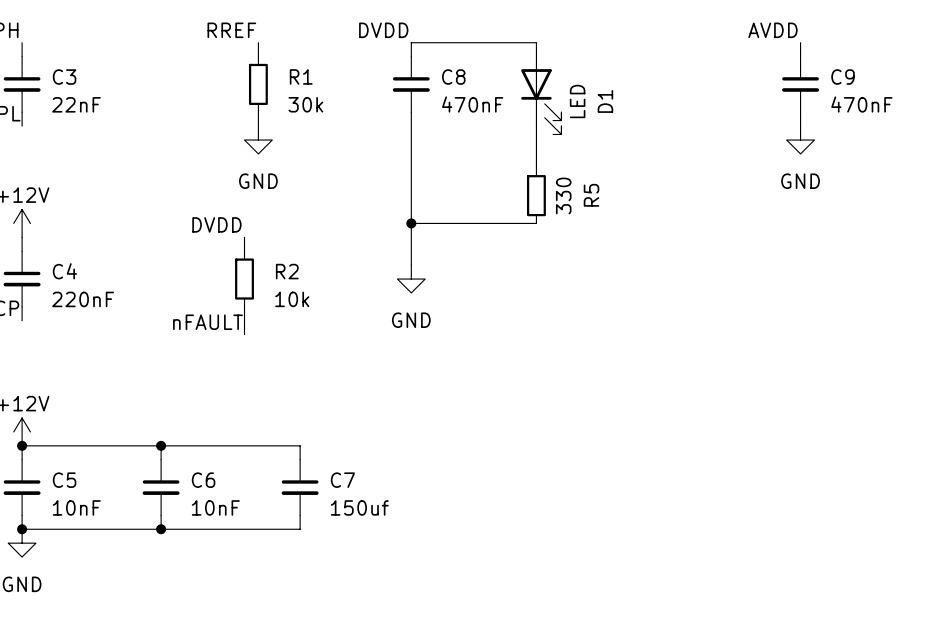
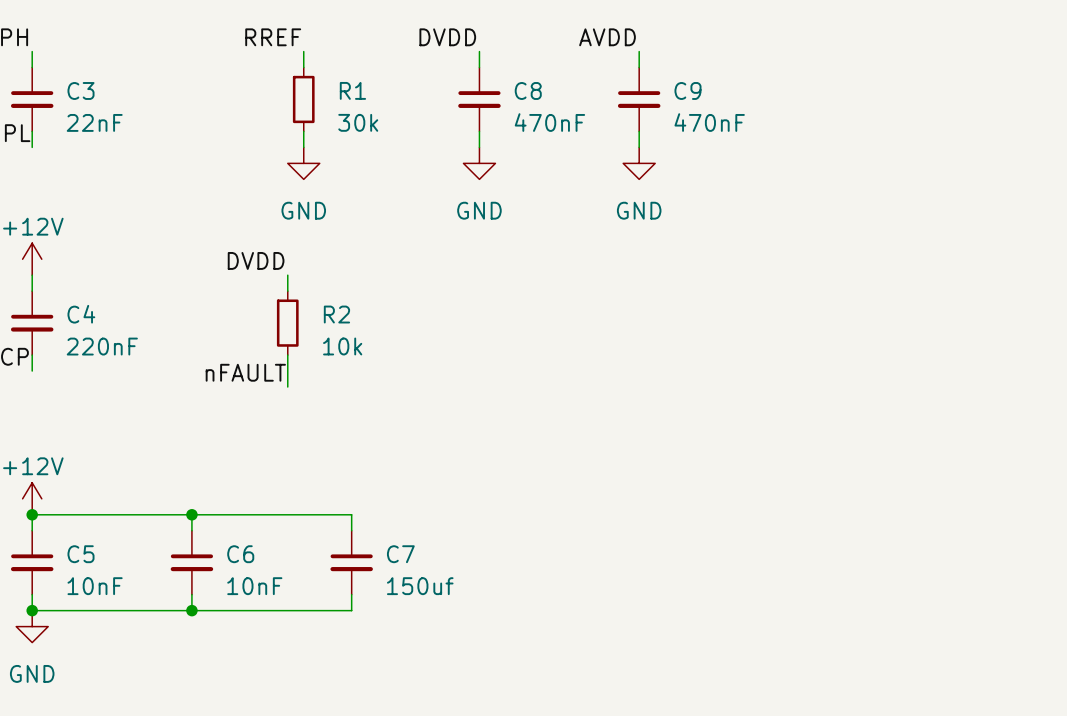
label position: AVDD (772, 30) -> AVDD (607, 37)
wire: (411, 42) (536, 42) -> none
wire: (800, 42) (800, 56) -> (639, 51) (639, 67)
C9 position: (800, 84) -> (639, 99)
D1: LED (541, 88) -> none
wire: (800, 112) (800, 126) -> (639, 131) (639, 147)
wire: (411, 126) (411, 265) -> none
wire: (536, 126) (536, 167) -> none
power symbol: none -> GND (479, 163)
power symbol: none -> GND (639, 163)
power symbol: GND (800, 140) -> none
R5: 330 (536, 195) -> none
wire: (411, 223) (536, 223) -> none
junction: (411, 223) -> none
power symbol: GND (411, 279) -> none

